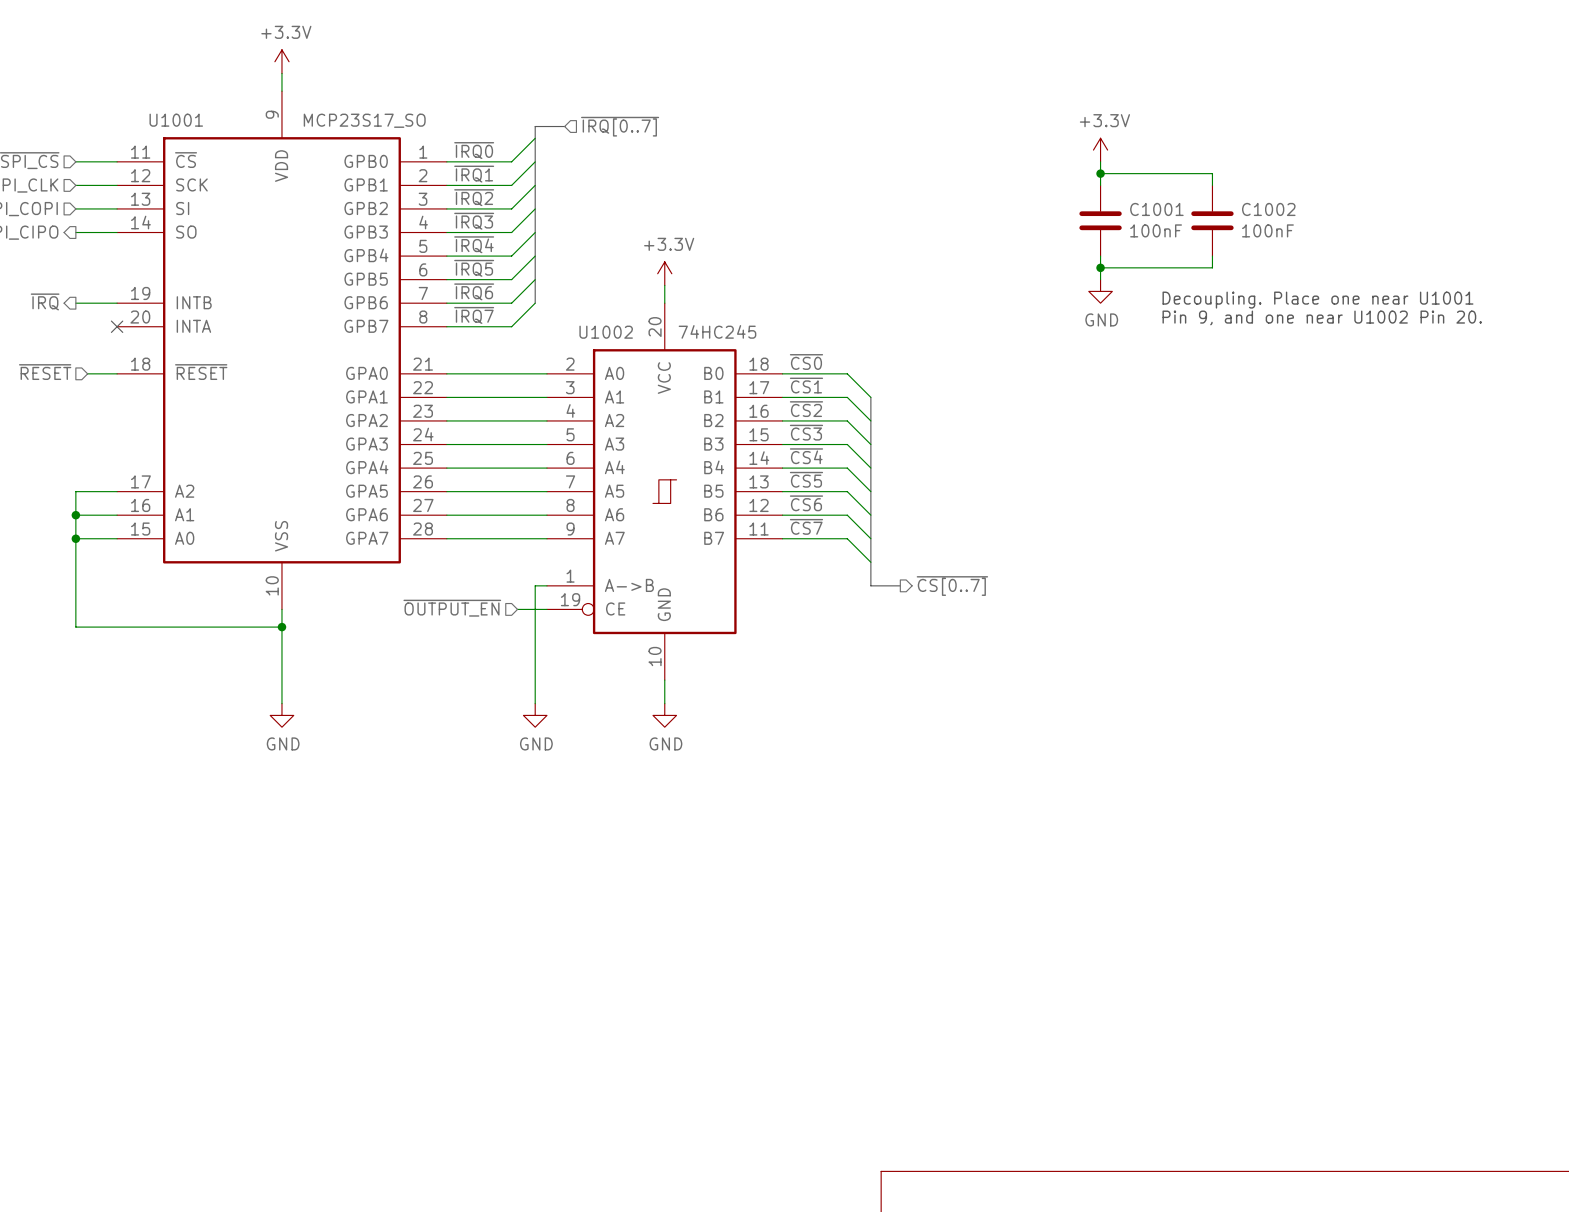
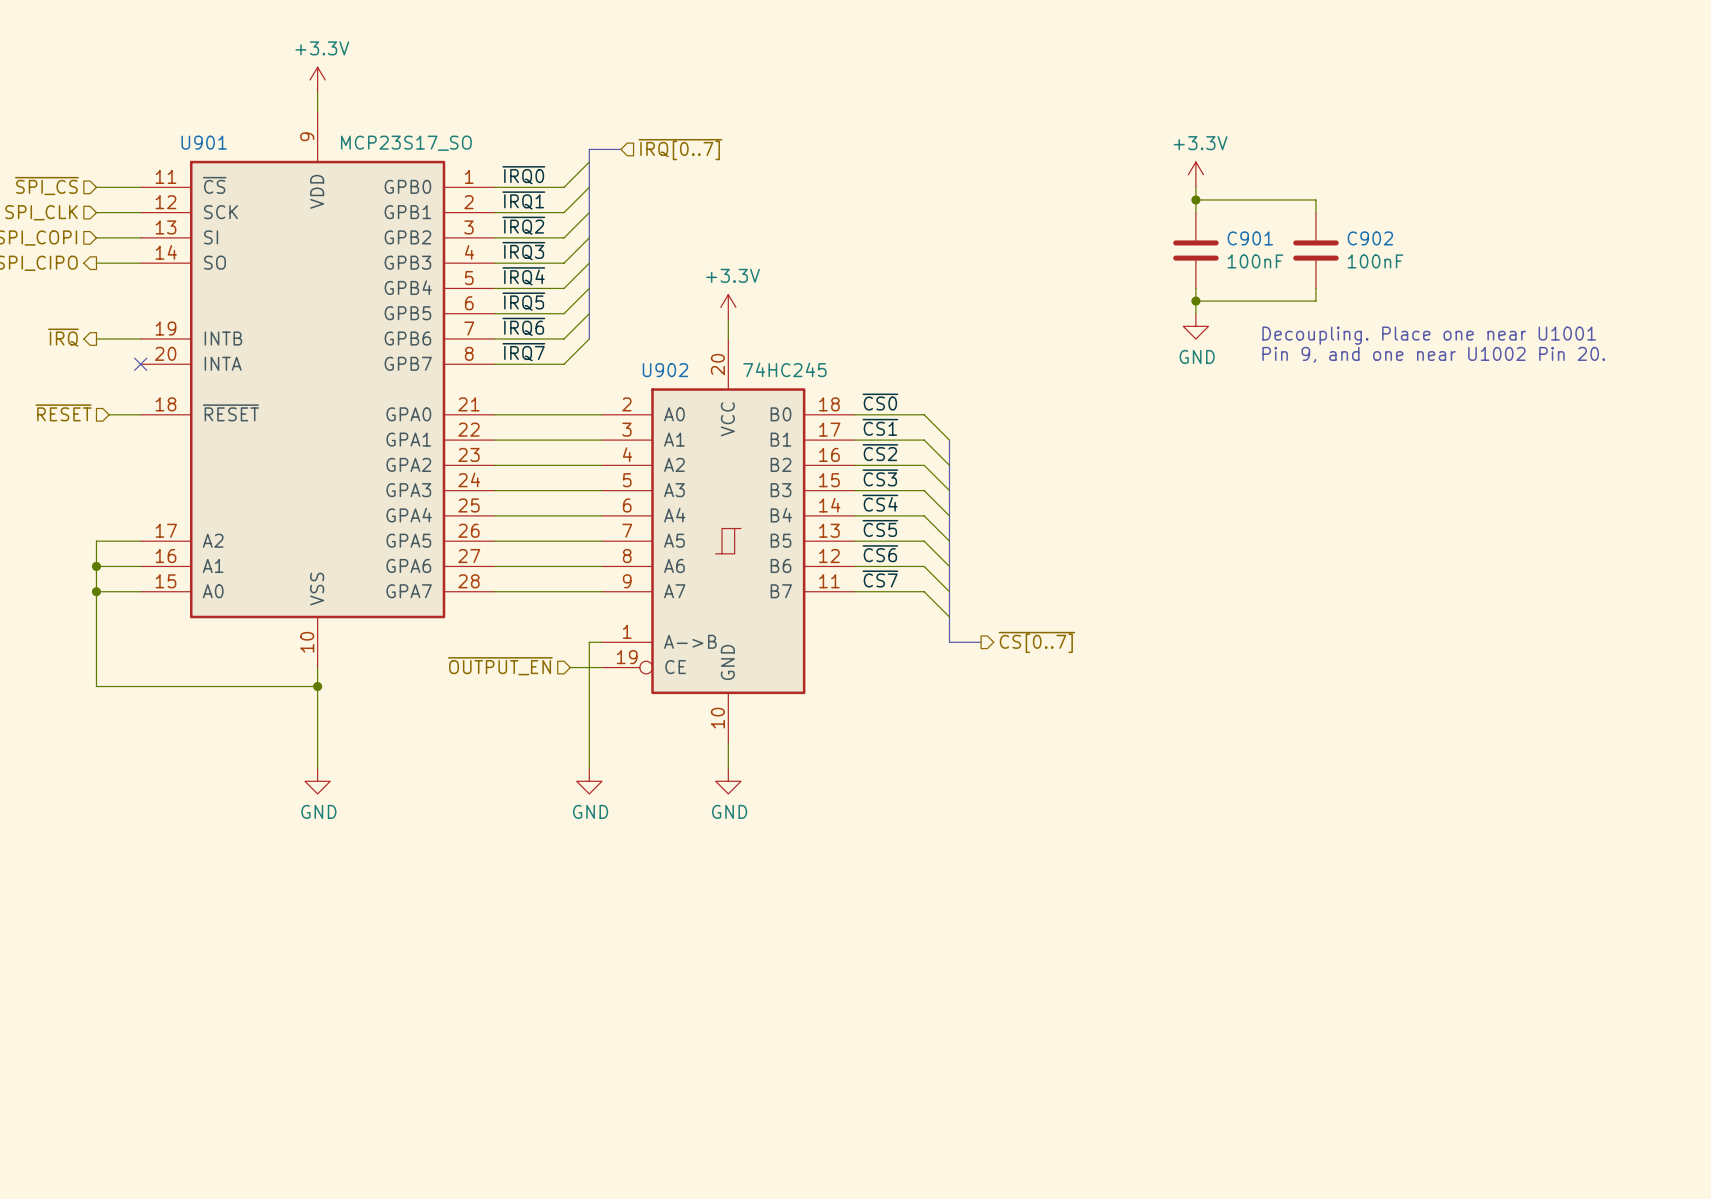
U1001 name: U1001 (176, 120) -> U901 (204, 142)
C1001 name: C1001 (1156, 209) -> C901 (1250, 238)
C1002 name: C1002 (1268, 209) -> C902 (1370, 238)
U1002 name: U1002 (606, 332) -> U902 (665, 370)

